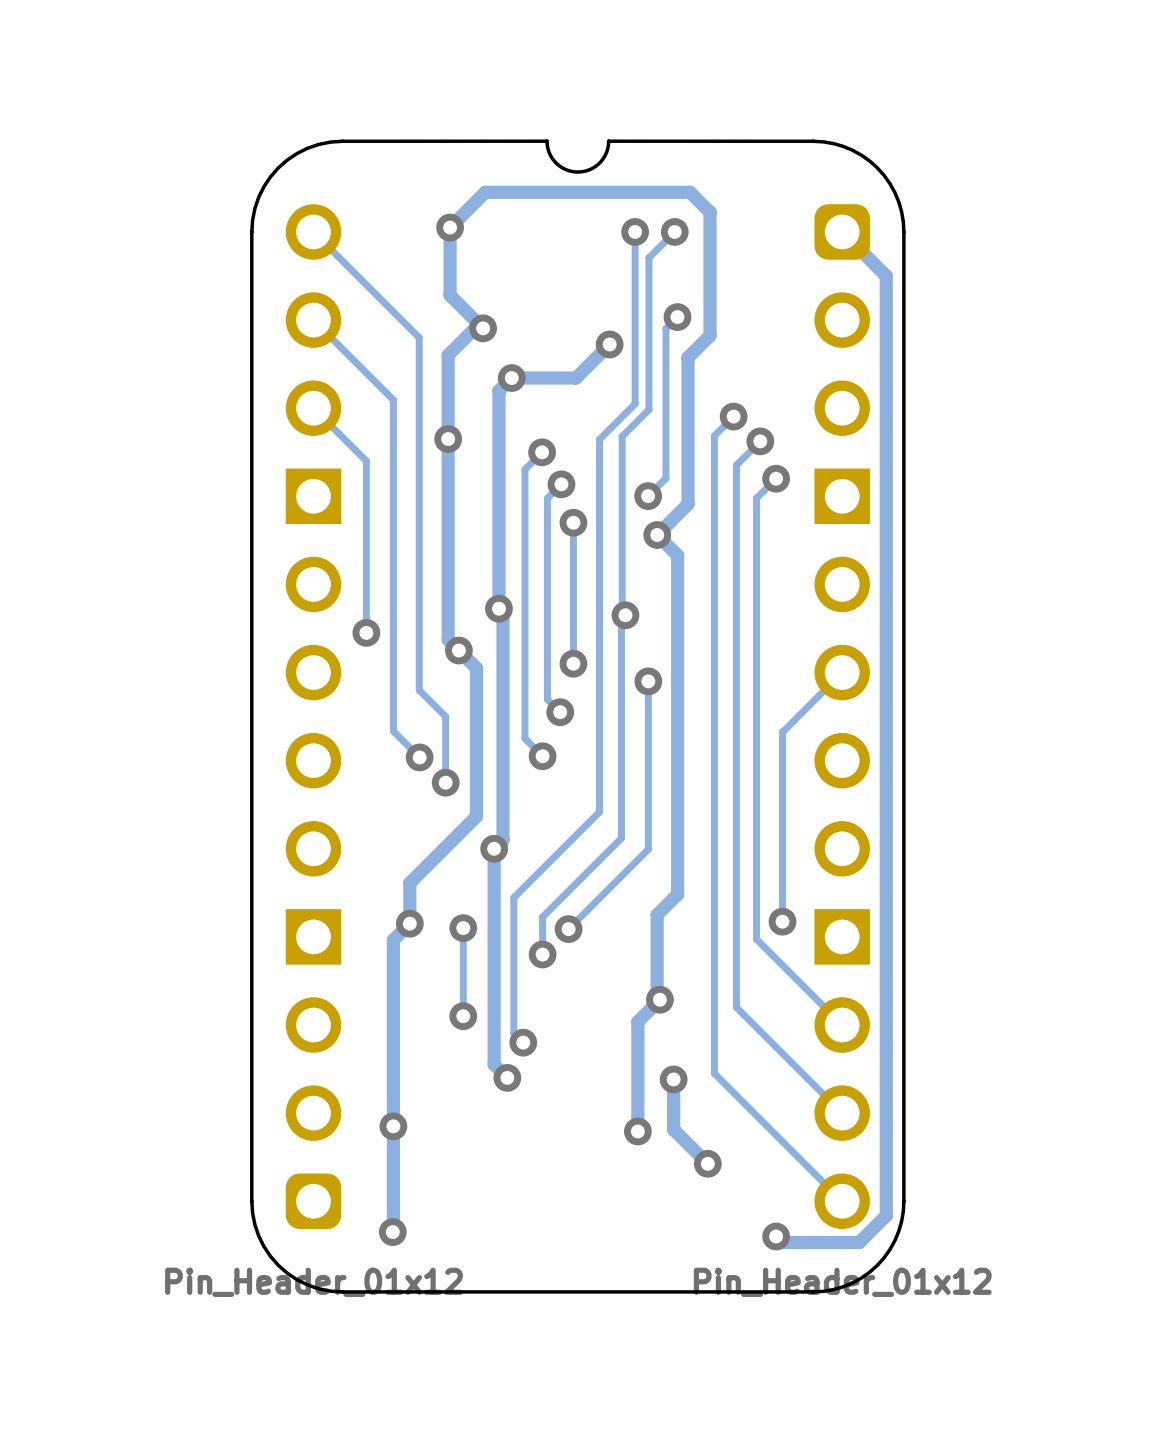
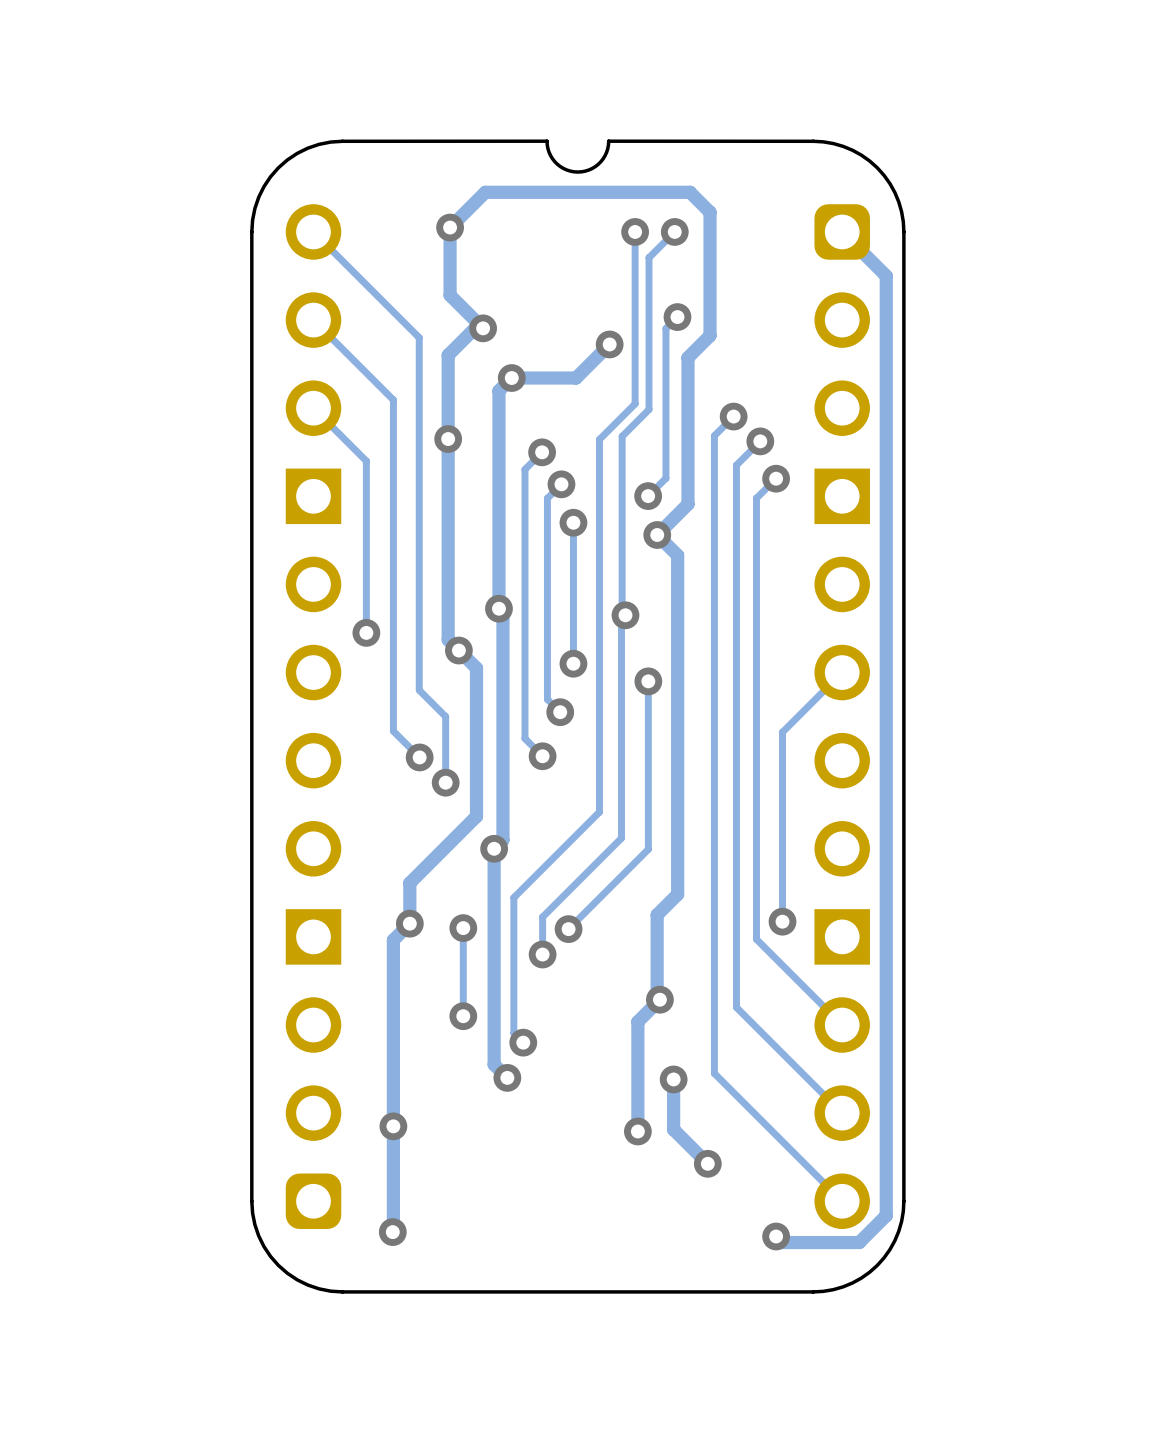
drawing: [165, 1267, 463, 1297] -> none
drawing: [693, 1267, 992, 1297] -> none

